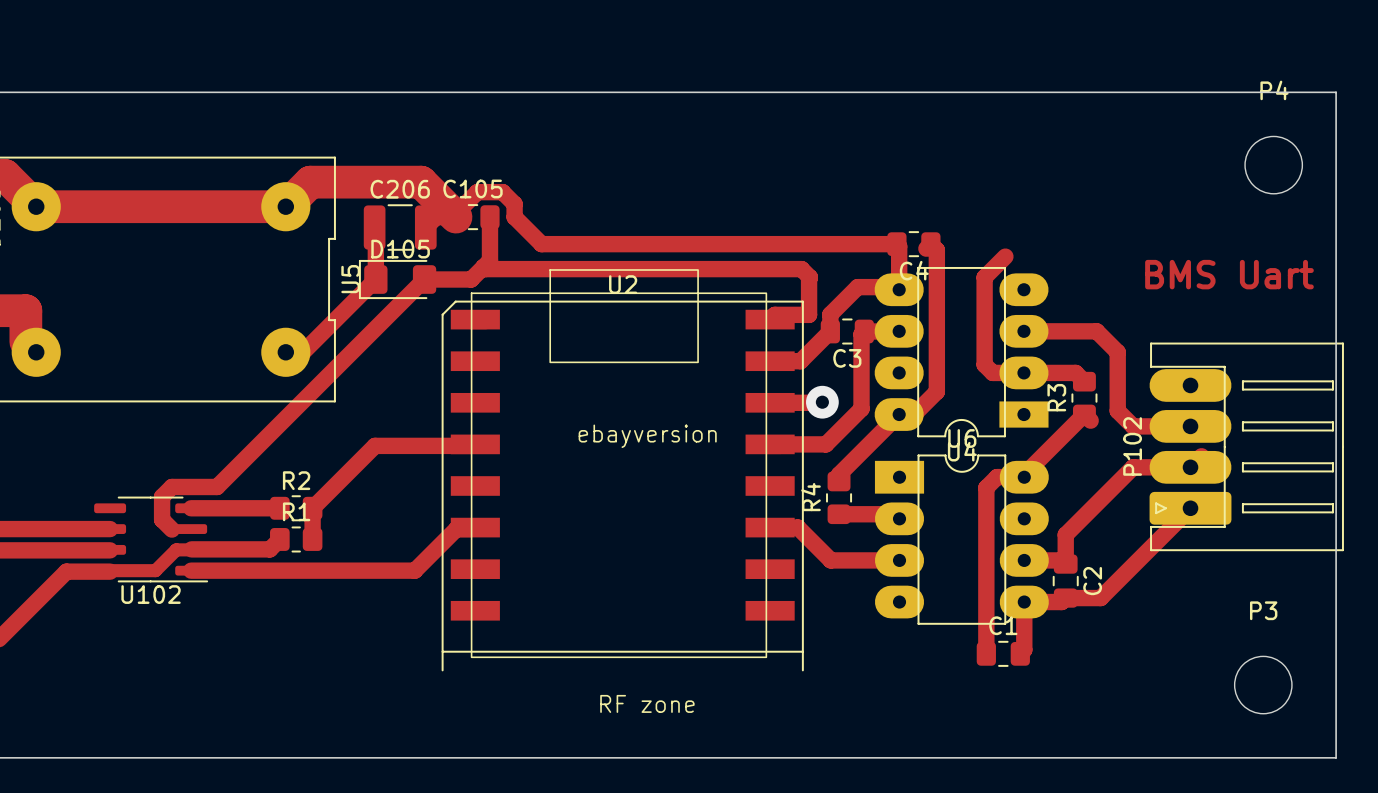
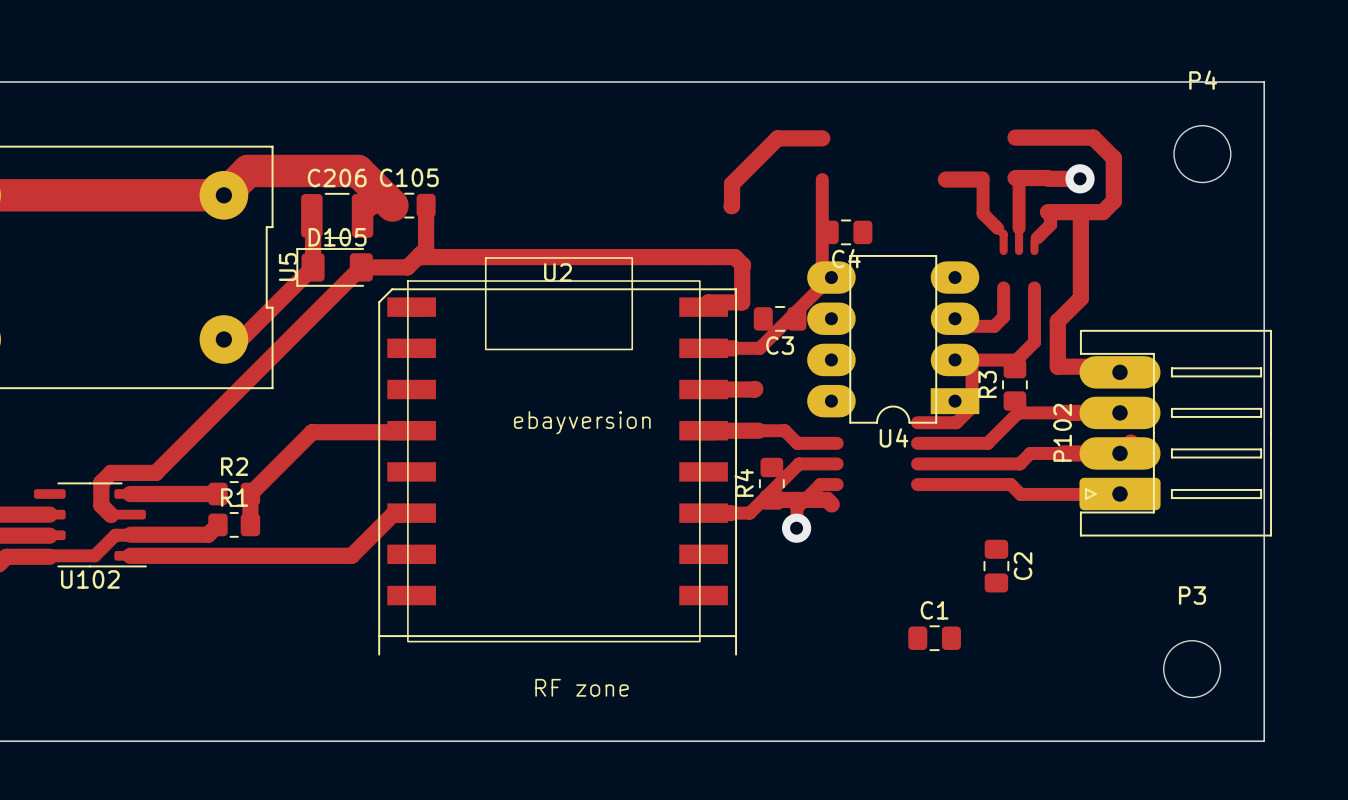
track: none -> (1015, 137) (1093, 137) (1113, 158) (1113, 201) (1102, 212) (1047, 212)
track: none -> (822, 138) (777, 138) (732, 184) (731, 206)
track: none -> (945, 179) (983, 178) (983, 213) (1003, 234) (1003, 251)
track: none -> (1080, 178) (1015, 178) (1019, 181) (1019, 251)
via: none -> (1080, 178)
track: (456, 213) (477, 192) (502, 192) (514, 204) (514, 217) (541, 244) (896, 244) (899, 246) (899, 289) (896, 287) (857, 287) (830, 314) (830, 331) (800, 361) -> (822, 179) (822, 285) (759, 348) (733, 348)
track: none -> (1047, 212) (1050, 214) (1050, 224) (1037, 238)
track: none -> (1080, 212) (1080, 298) (1057, 321) (1057, 366) (1114, 366) (1120, 372)
track: (926, 248) (930, 244) (936, 250) (936, 391) (914, 414) (899, 414) -> none
track: none -> (1034, 240) (1034, 251)
track: (1005, 256) (984, 277) (984, 364) (992, 372) (1075, 372) (1084, 381) -> none
text: BMS Uart (1229, 274) -> none
track: none -> (1003, 287) (1003, 317) (994, 326) (972, 326)
track: none -> (1034, 287) (1034, 342) (1016, 360) (972, 360) (972, 407) (956, 422) (917, 422)
track: (899, 331) (864, 331) (861, 334) (861, 408) (825, 444) -> (837, 443) (797, 443) (784, 430) (758, 430)
track: (1023, 331) (1096, 331) (1117, 352) (1117, 410) (1133, 426) -> (1018, 412) (1063, 412)
via: (822, 402) -> none
track: (899, 414) (839, 474) (839, 481) -> none
track: (1090, 420) (1084, 414) (1024, 474) (1024, 477) (1016, 477) -> none
track: none -> (1018, 412) (987, 443) (917, 443)
track: (1133, 467) (1065, 534) (1065, 564) (1062, 560) (1024, 560) -> (1063, 453) (1030, 453) (1019, 463) (917, 463)
track: (1015, 477) (997, 477) (986, 487) (986, 653) -> none
track: none -> (837, 484) (820, 484) (796, 508) (796, 528)
track: (1190, 508) (1100, 598) (1065, 598) (1061, 602) (1024, 602) (1024, 649) (1020, 653) -> (1120, 494) (1020, 494) (1010, 484) (917, 484)
track: (798, 527) (830, 560) (899, 560) -> (731, 513) (749, 513) (799, 463) (837, 463)
U6: (961, 539) -> none
via: none -> (796, 528)

